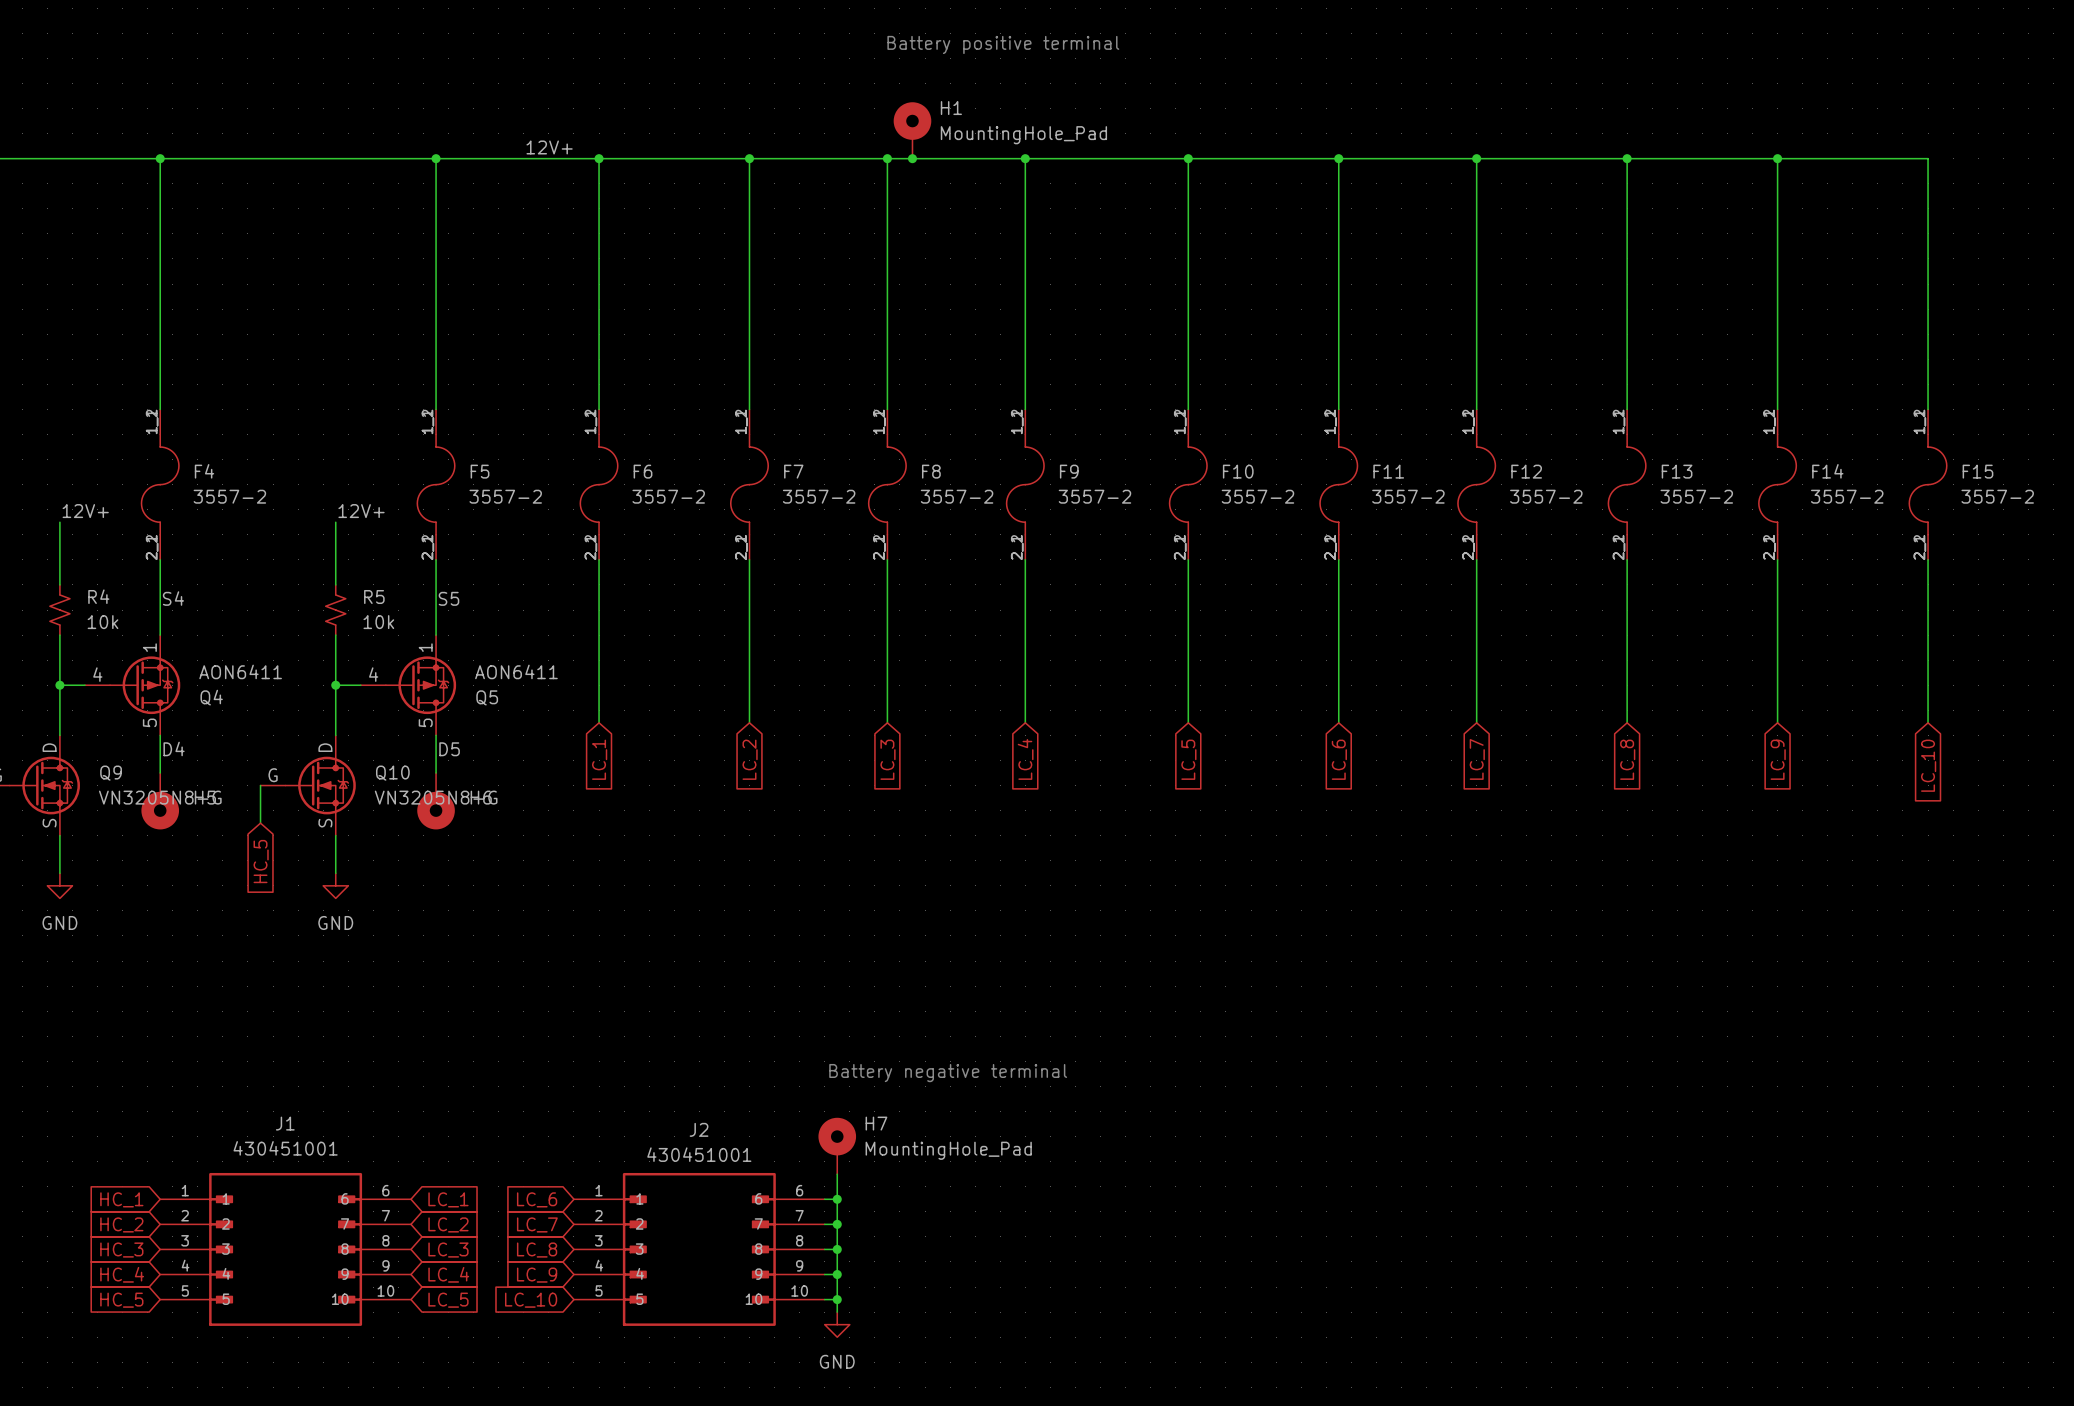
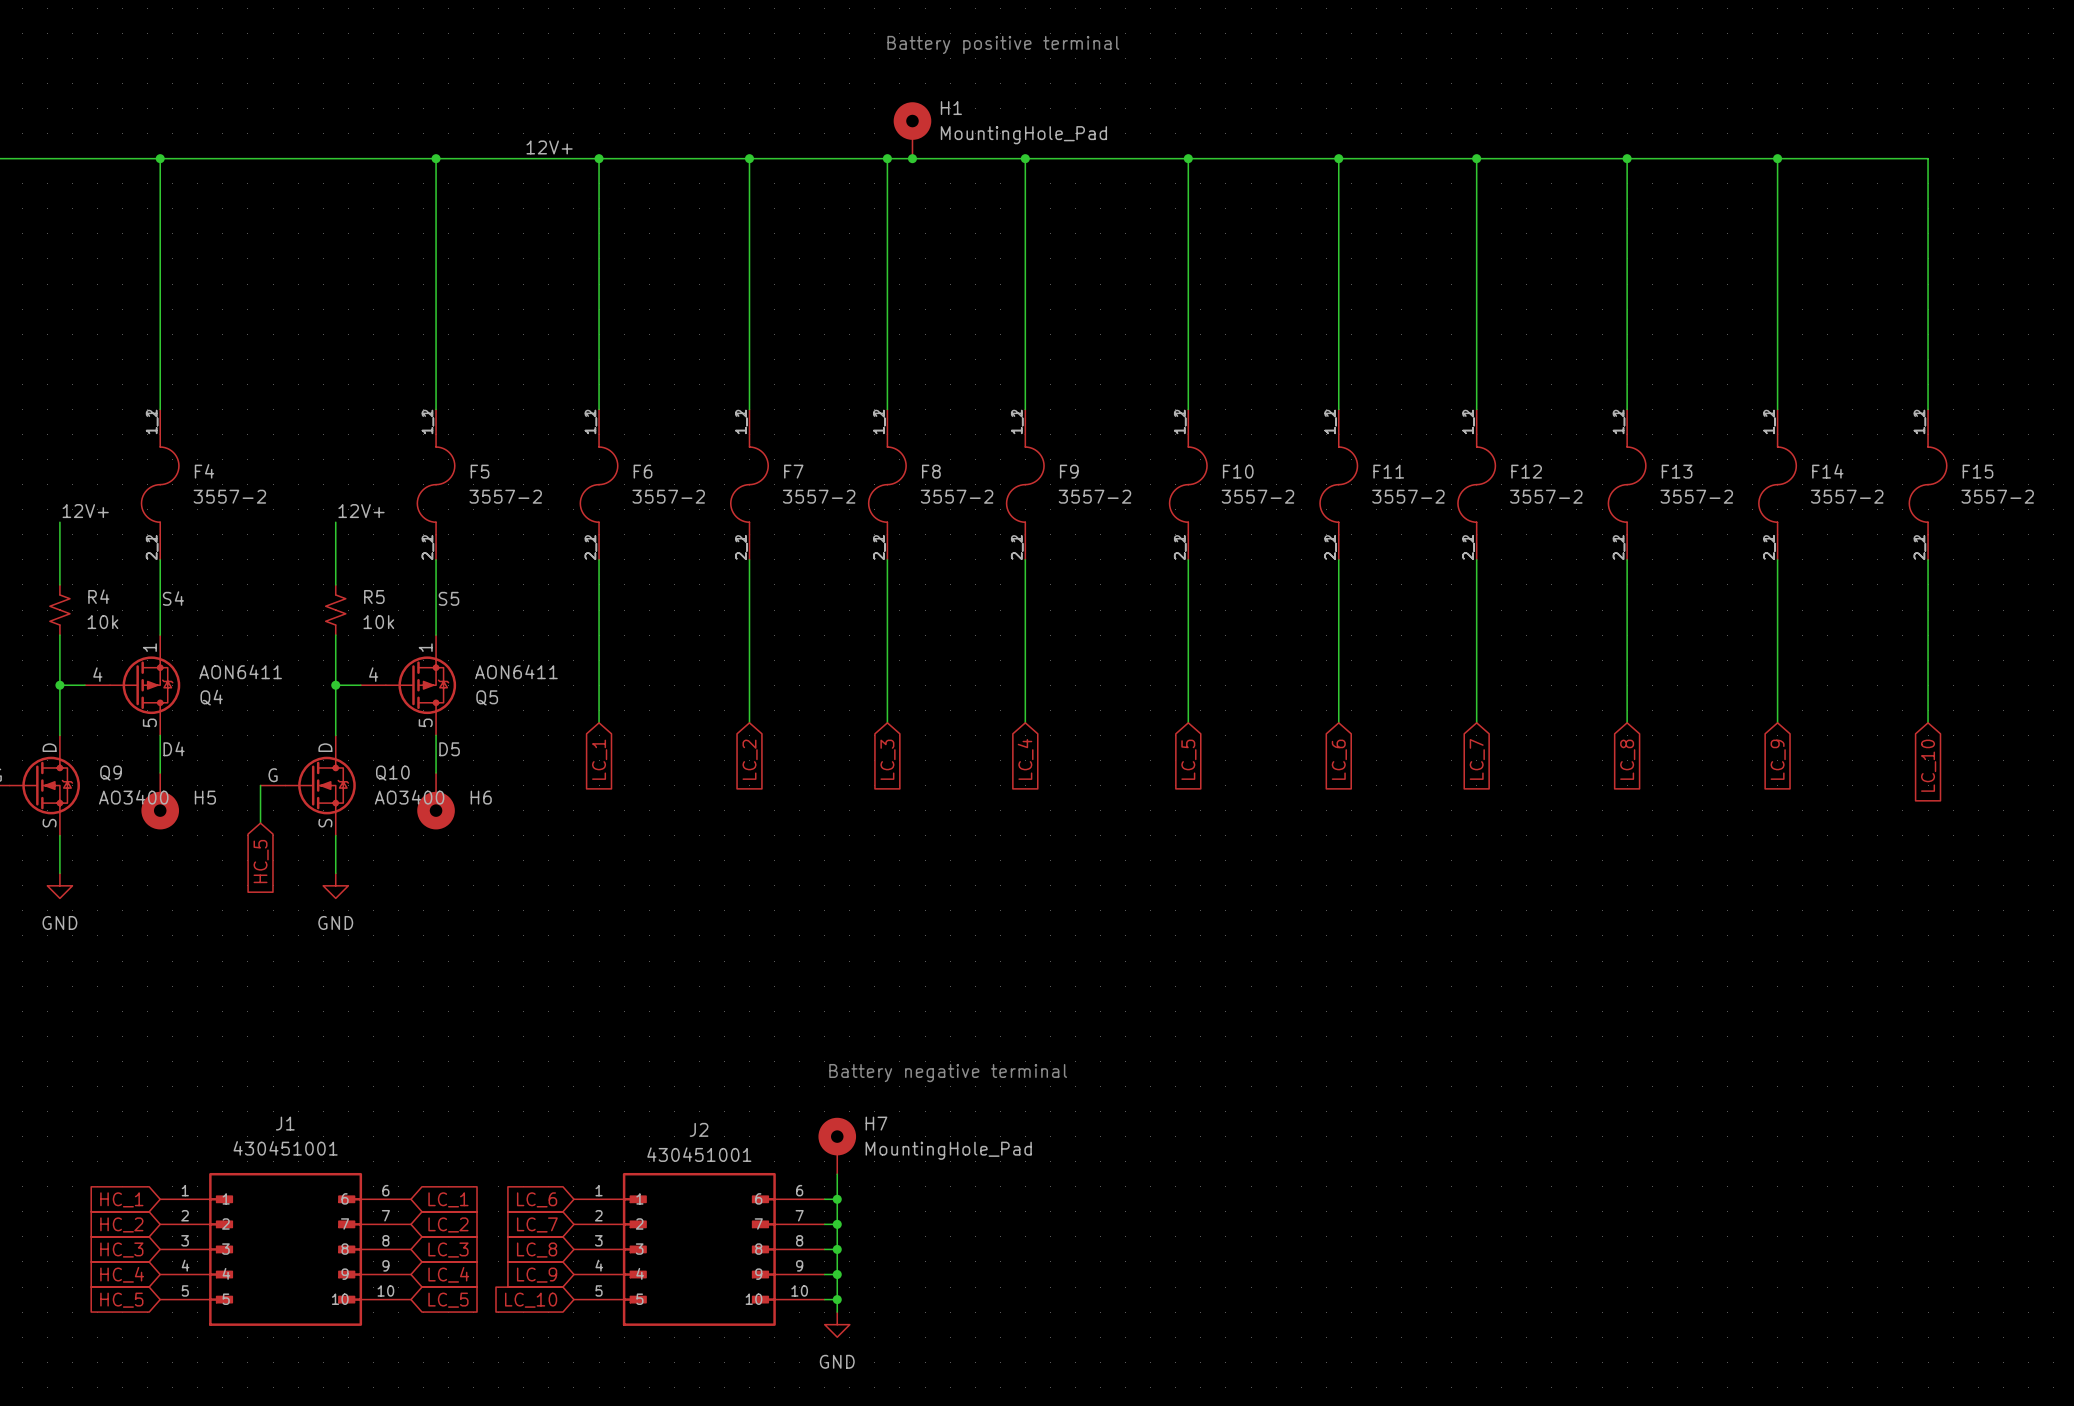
Q9 value: VN3205N8-G (160, 797) -> AO3400 (133, 797)
Q10 value: VN3205N8-G (436, 797) -> AO3400 (409, 797)

